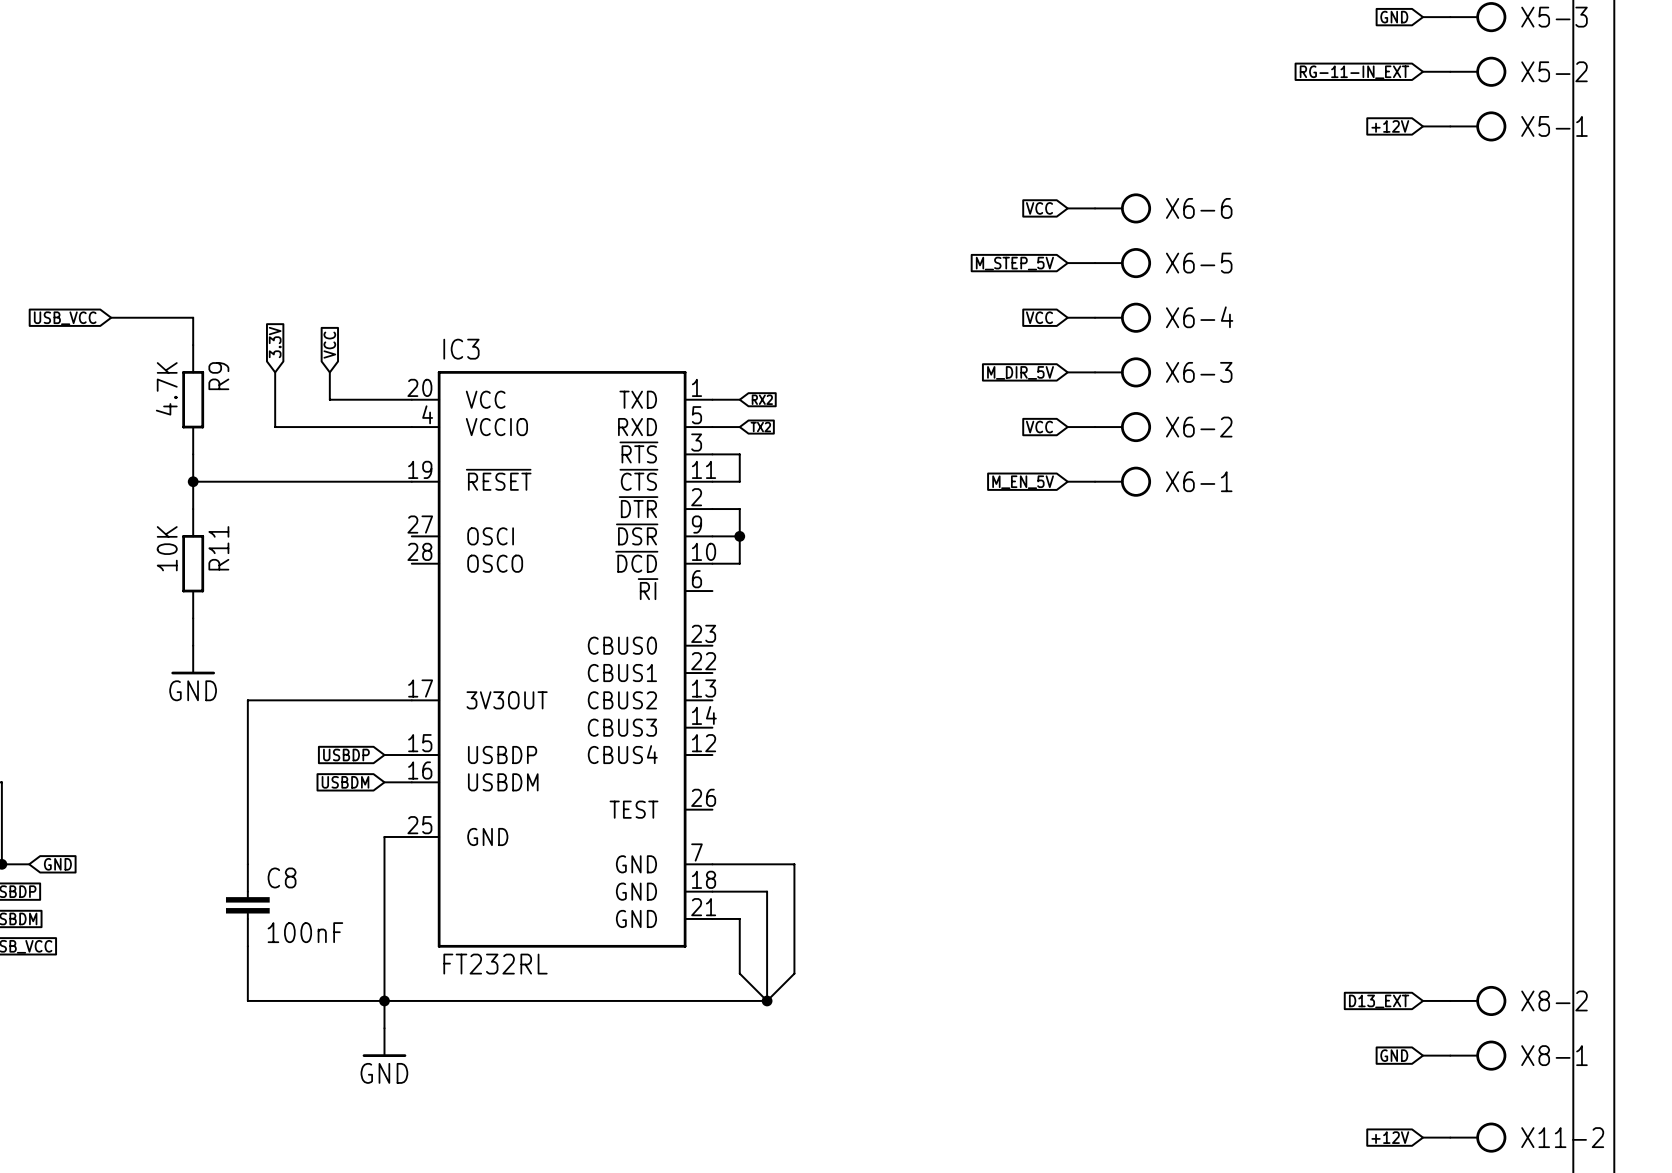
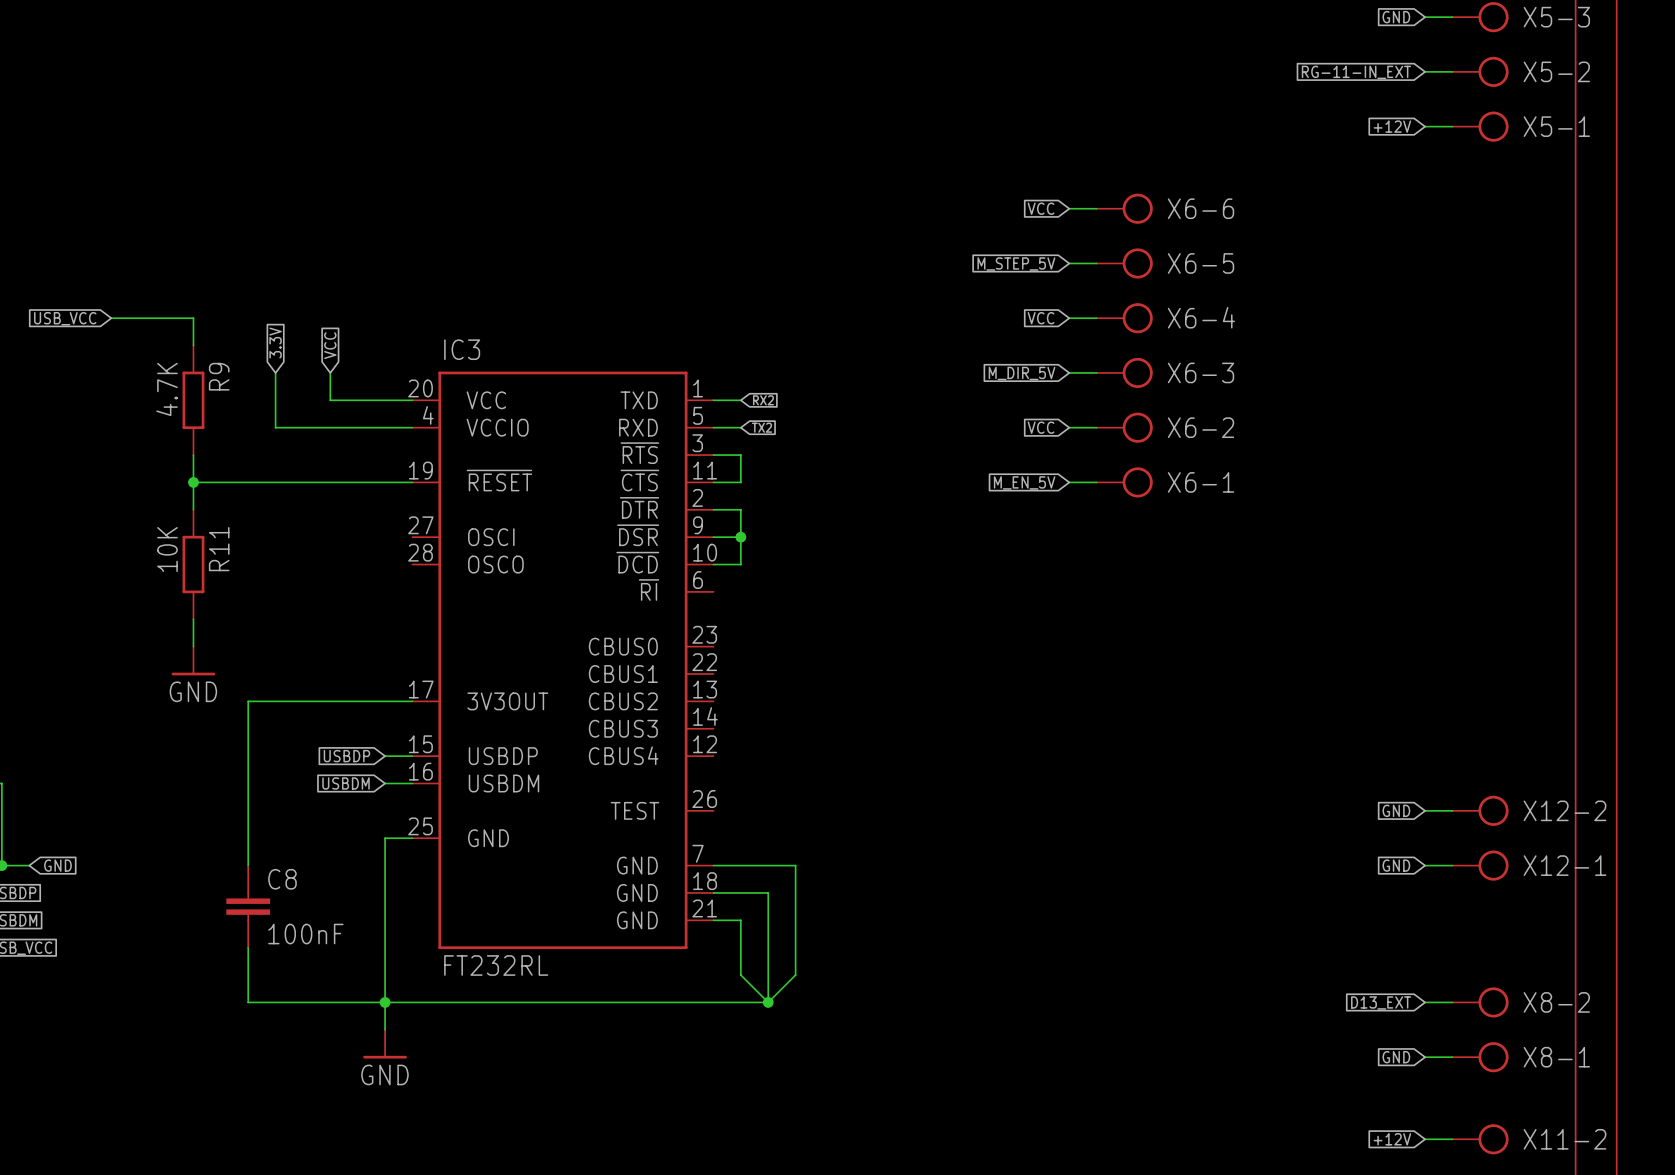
global label: none -> GND (1396, 810)
wire: none -> (1425, 810) (1452, 810)
X12-2: none -> (1480, 810)
global label: none -> GND (1396, 865)
wire: none -> (1425, 865) (1452, 865)
X12-1: none -> (1480, 865)

